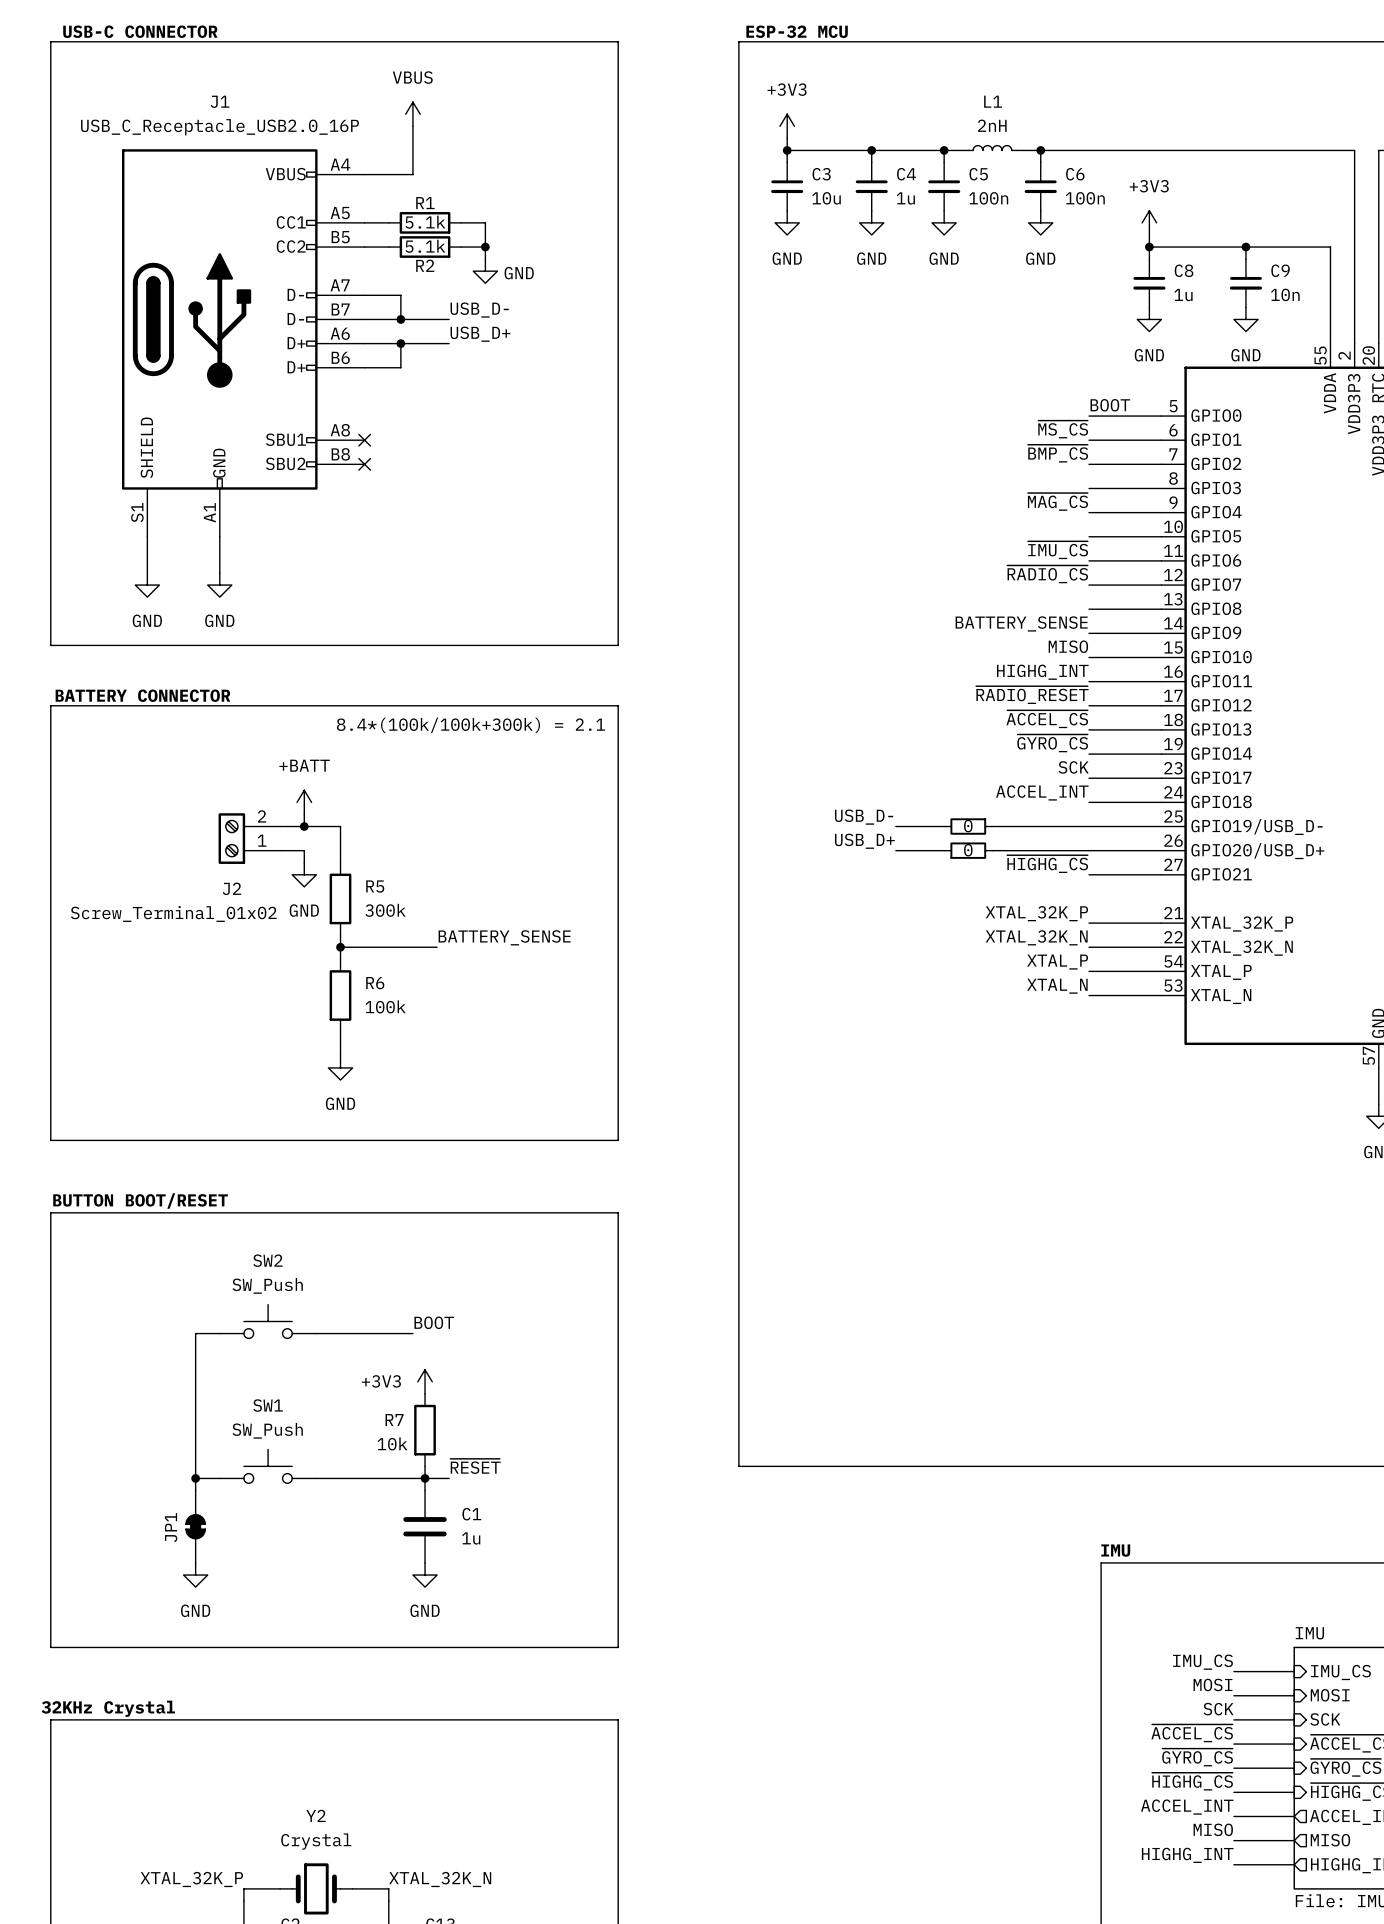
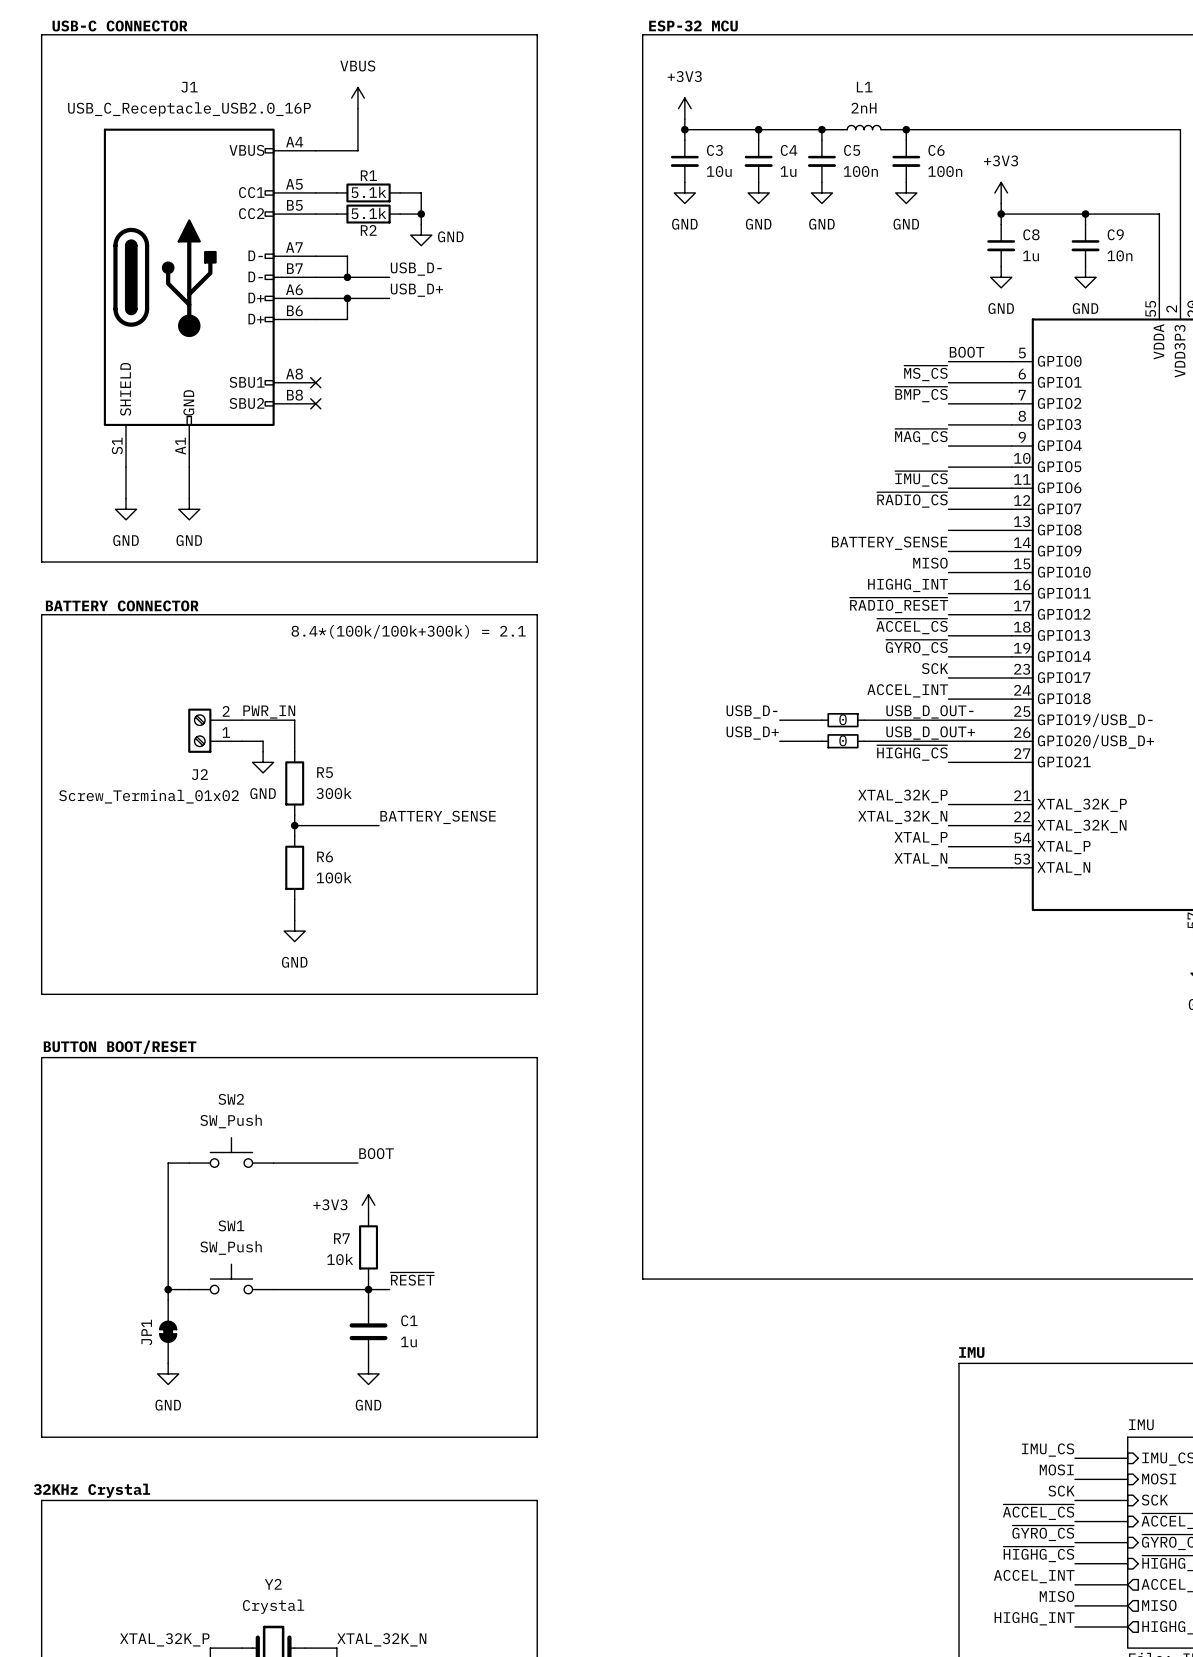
power symbol: +BATT (304, 802) -> none
wire: (304, 814) (304, 826) -> none
label: none -> PWR_IN (269, 712)
label: none -> USB_D_OUT- (929, 711)
junction: (304, 826) -> none
label: none -> USB_D_OUT+ (930, 733)

